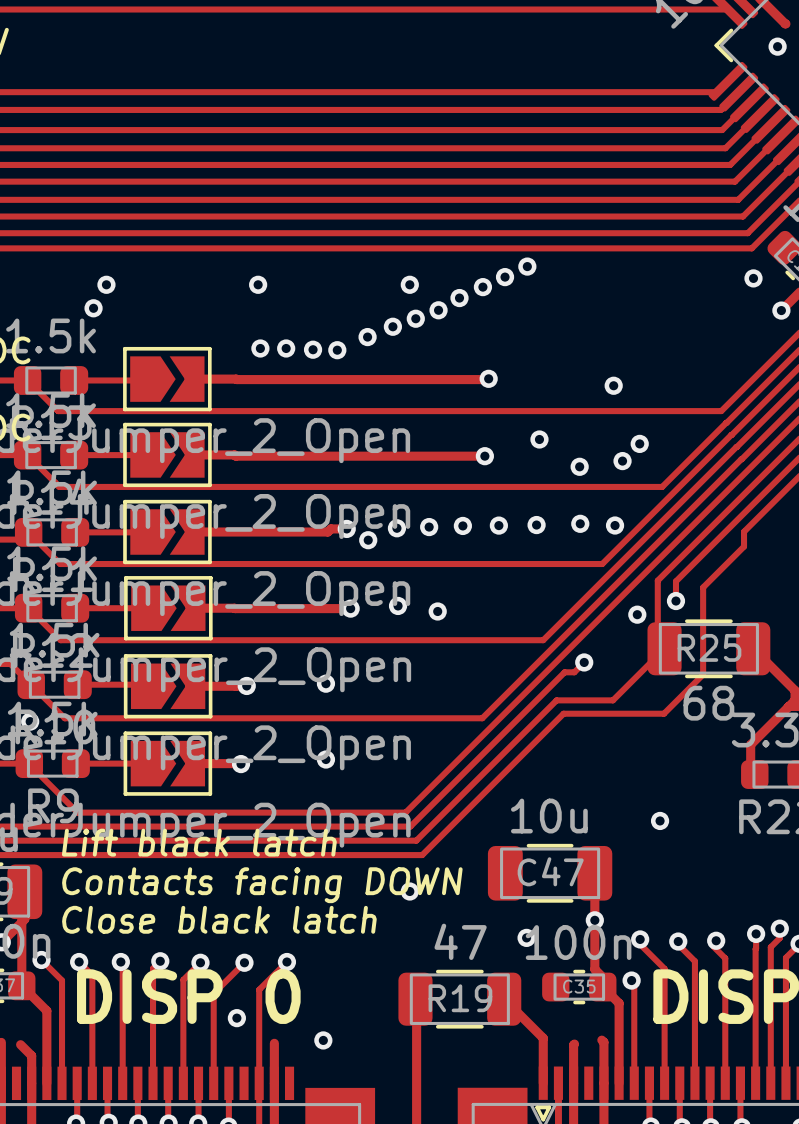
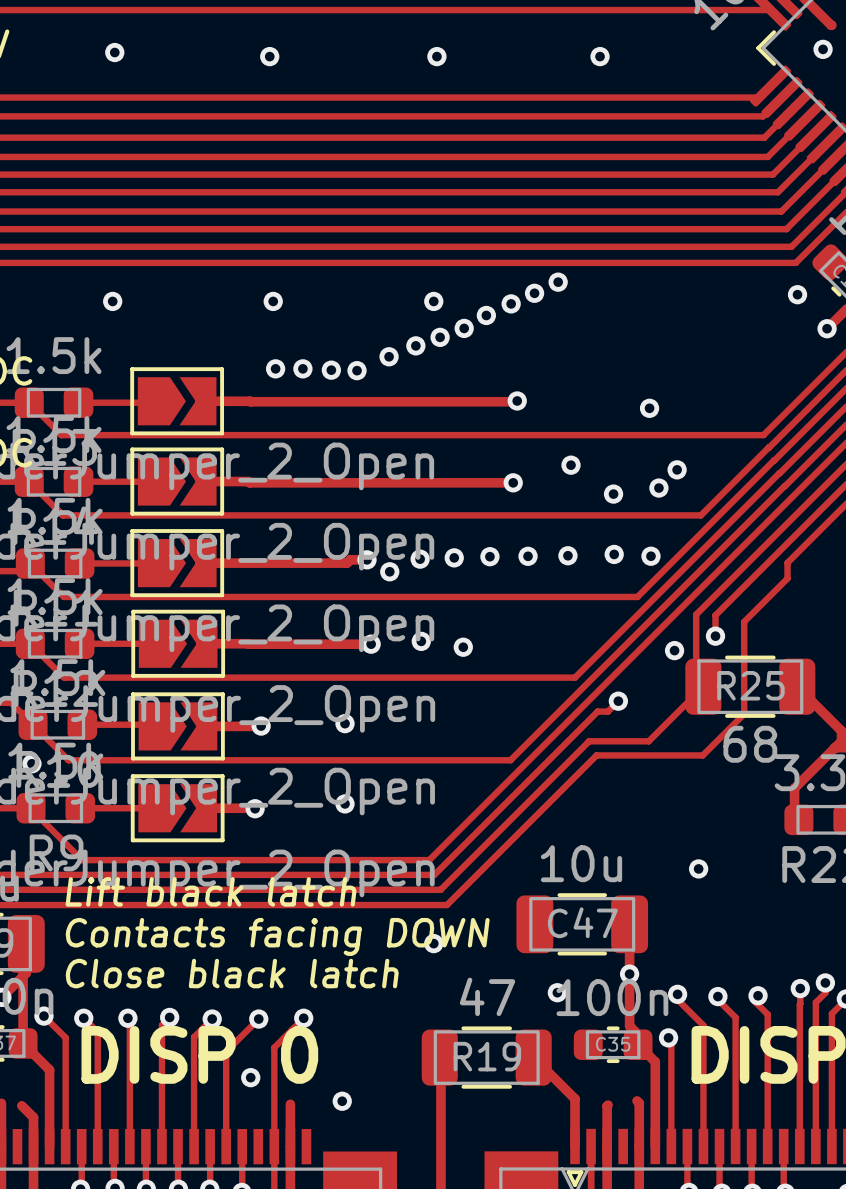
via: none -> (114, 52)
via: none -> (269, 56)
via: none -> (436, 56)
via: none -> (600, 56)
via: (93, 308) -> none

